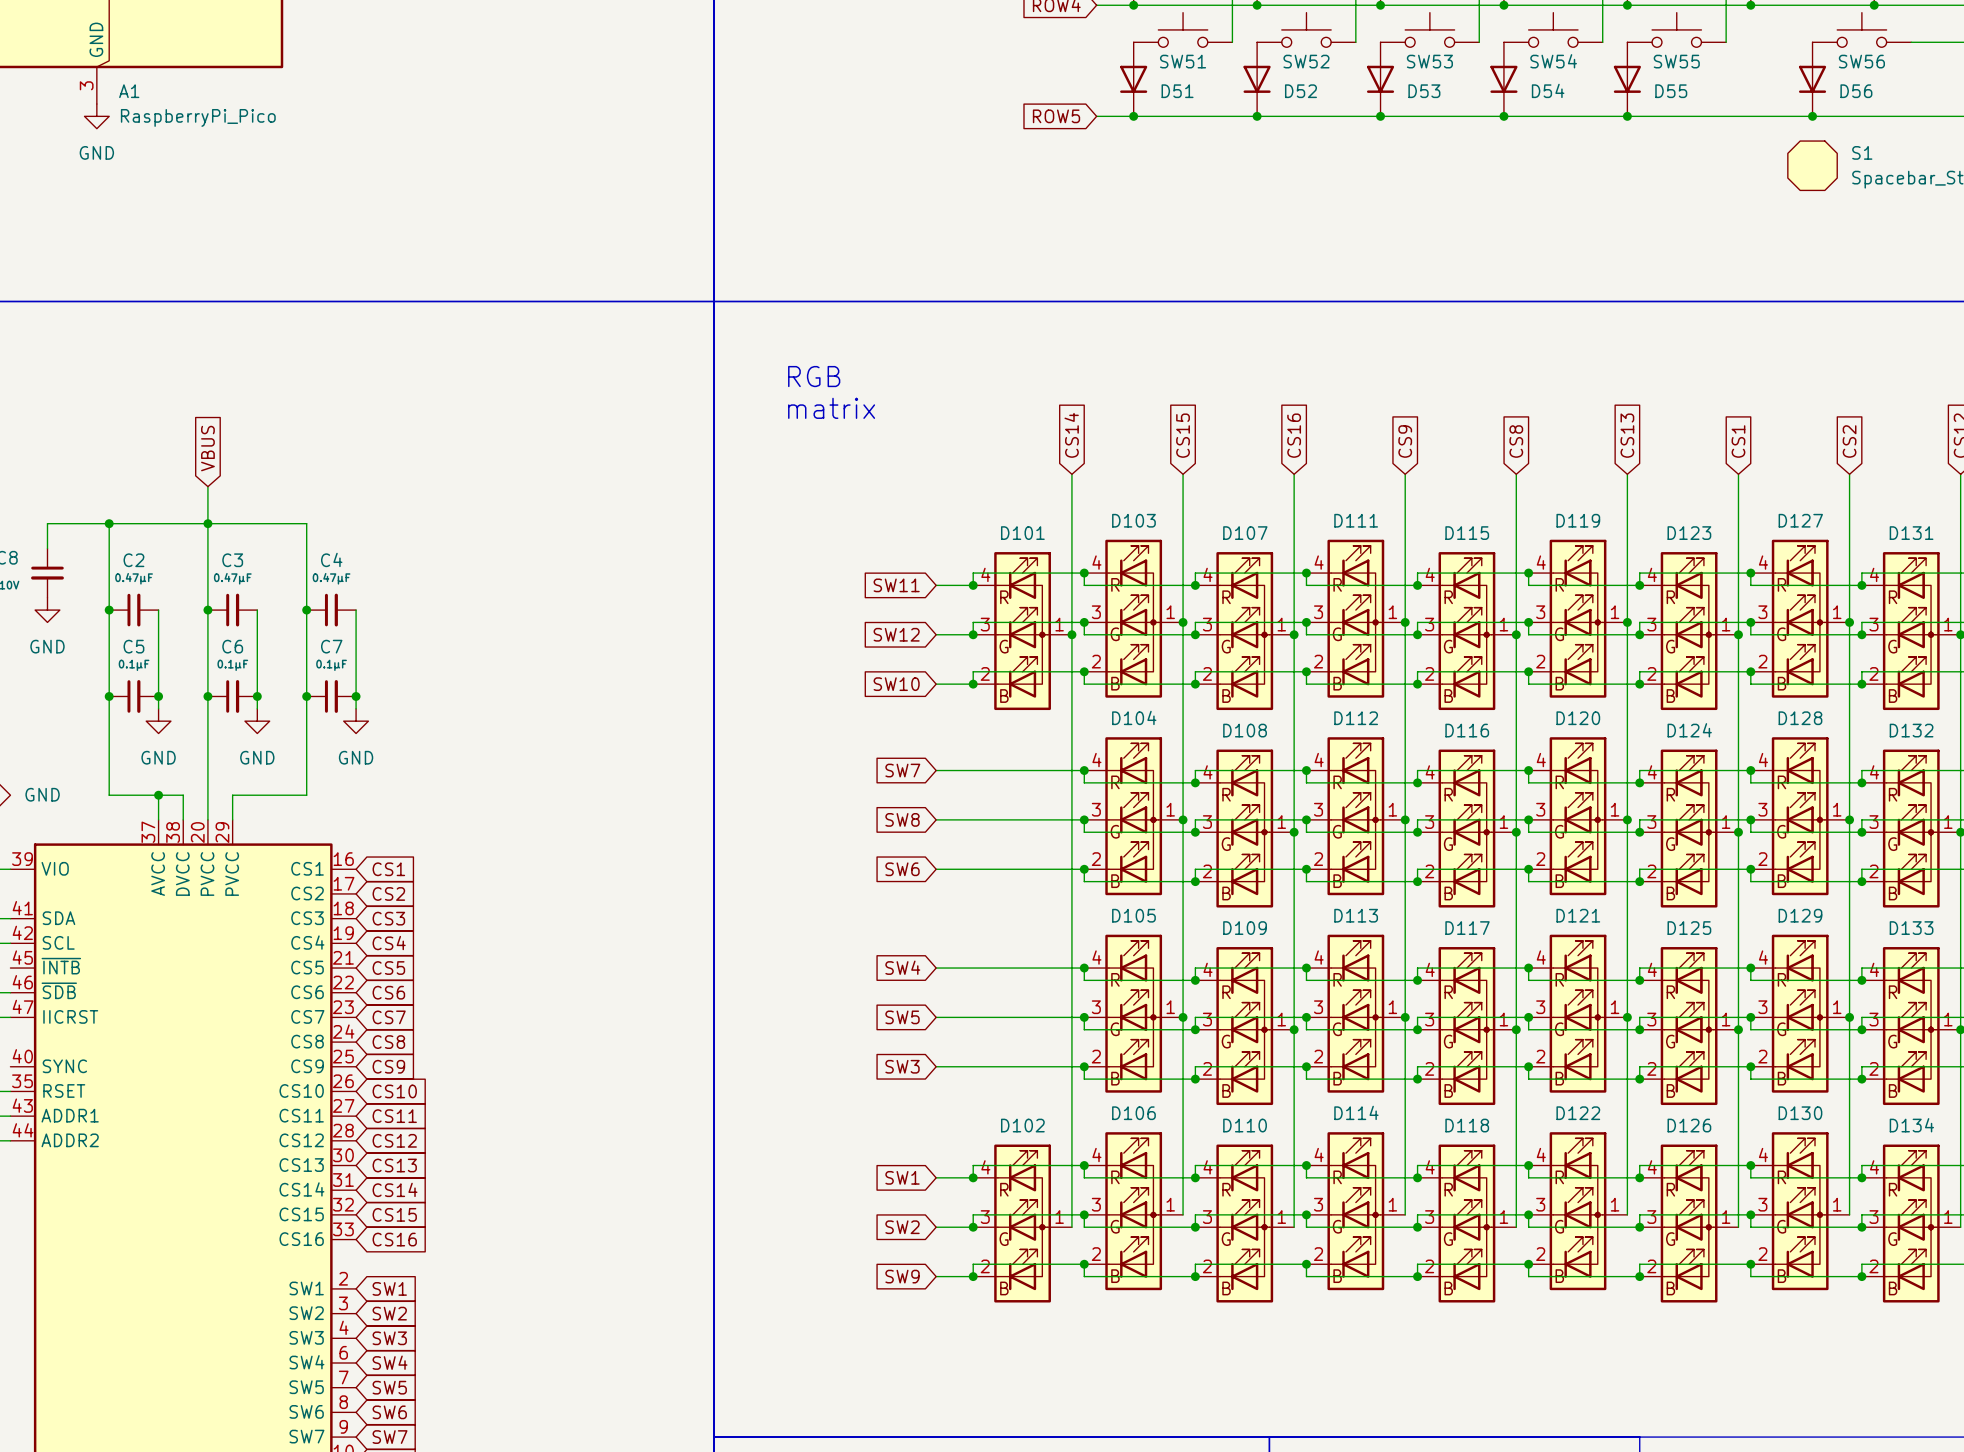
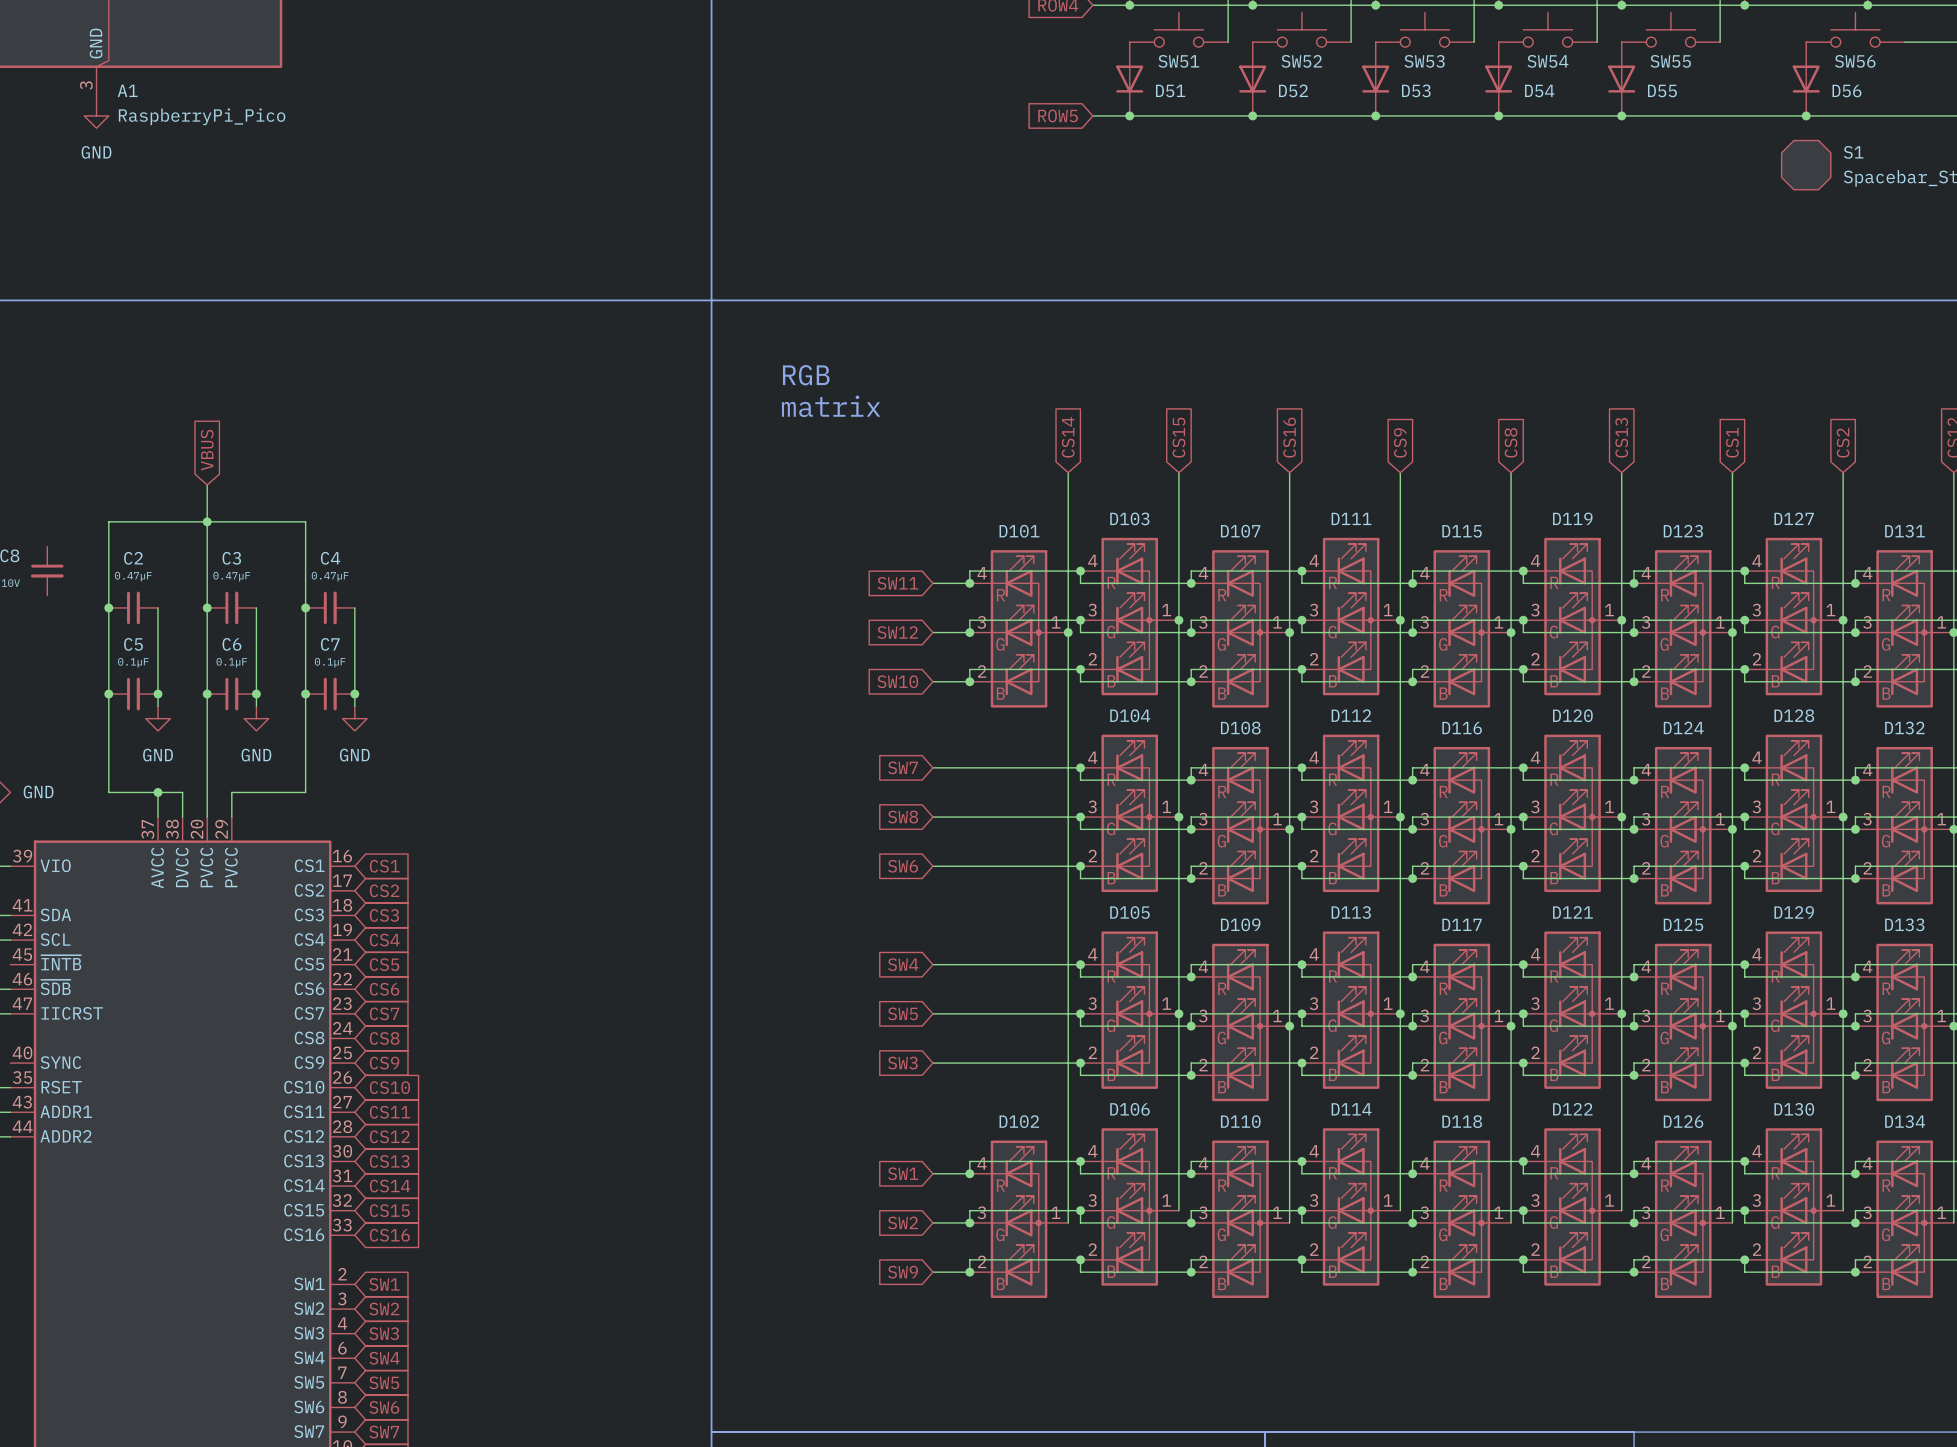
wire: (109, 523) (47, 523) (47, 548) -> none
junction: (109, 523) -> none
power symbol: GND (47, 610) -> none

